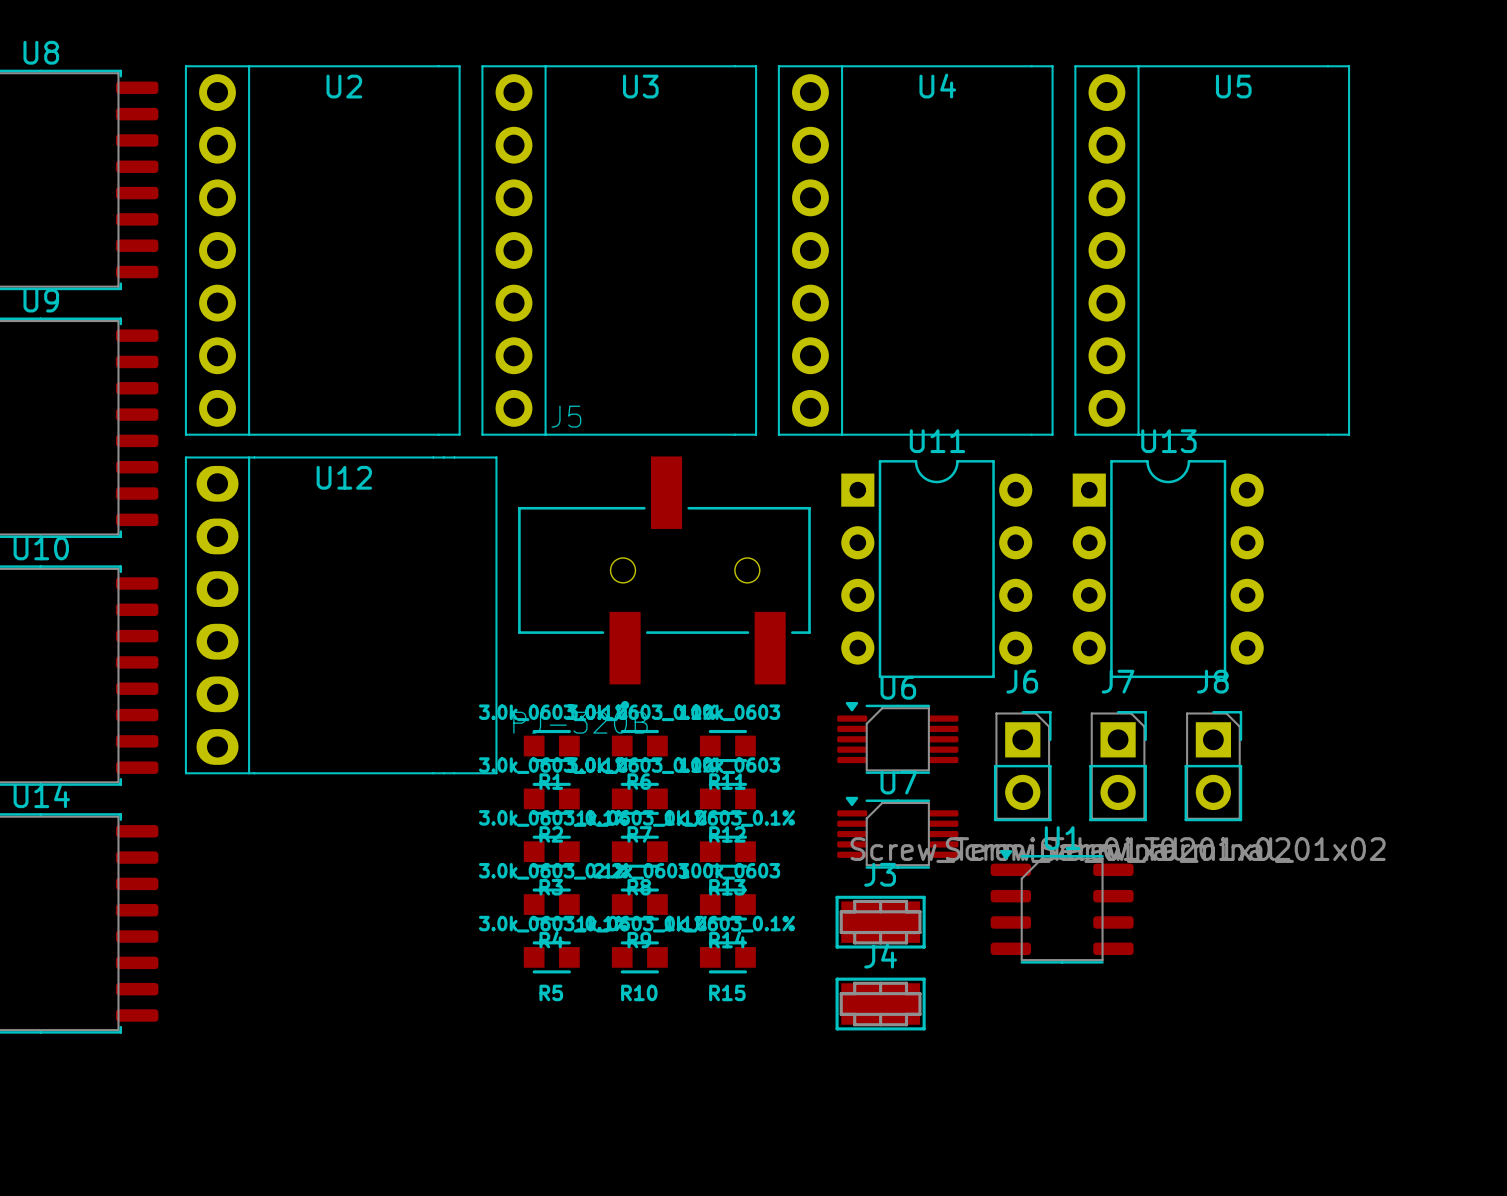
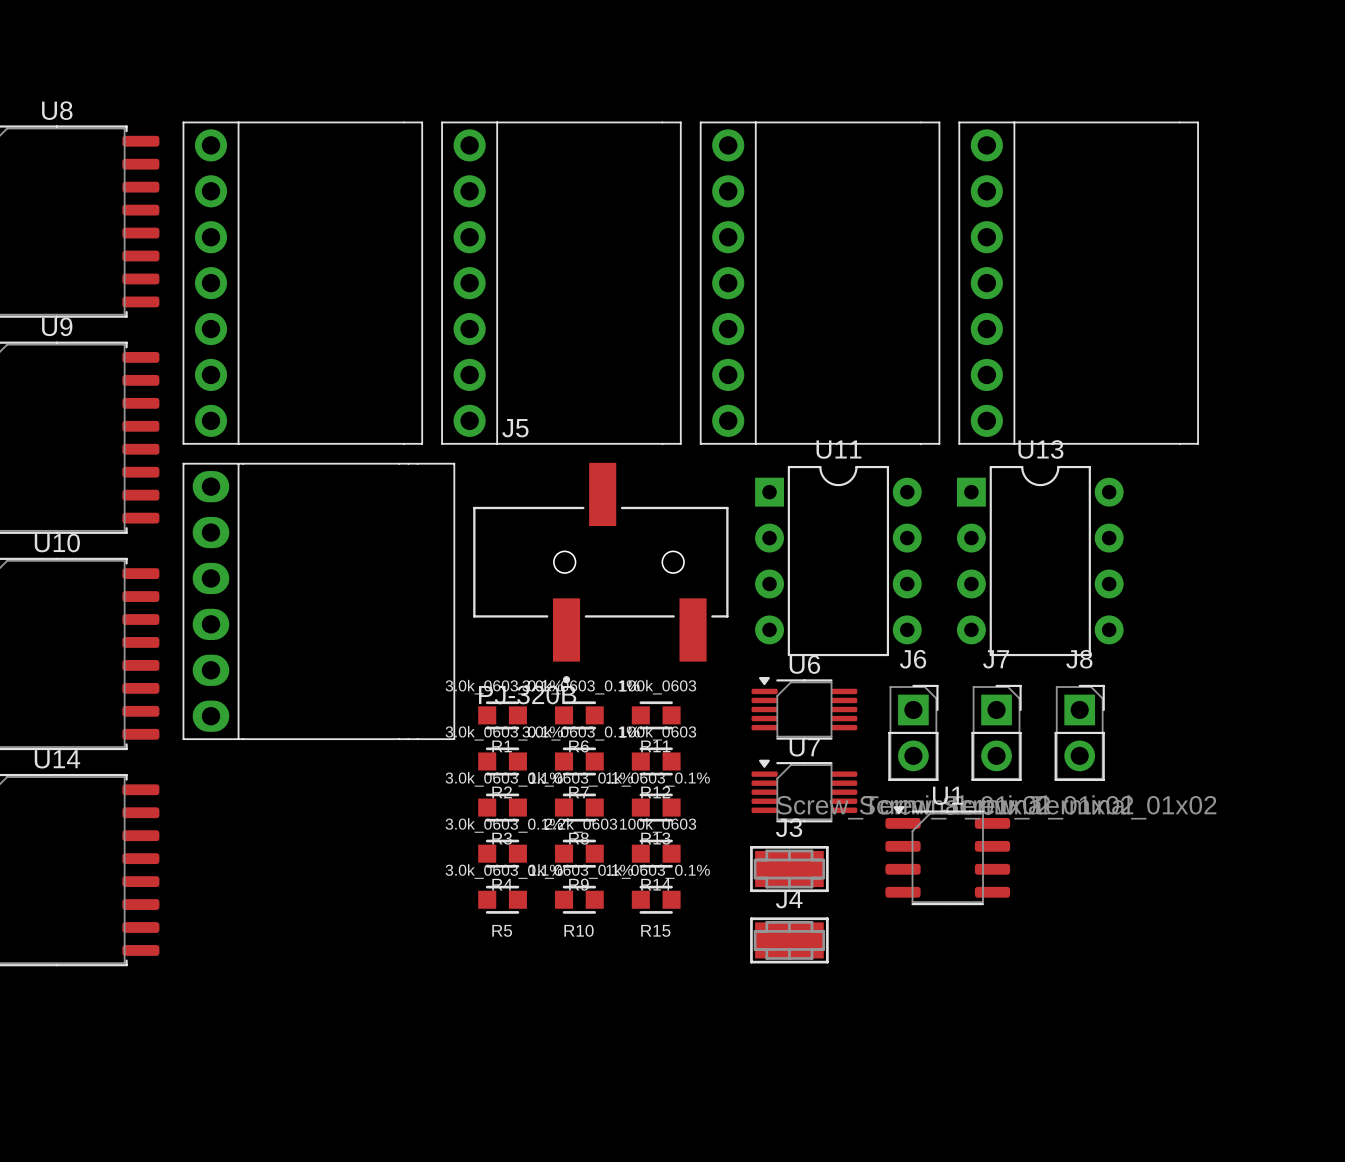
U2 name: U2 (344, 86) -> none
U3 name: U3 (640, 86) -> none
U4 name: U4 (937, 86) -> none
U5 name: U5 (1233, 86) -> none
U12 name: U12 (344, 477) -> none

